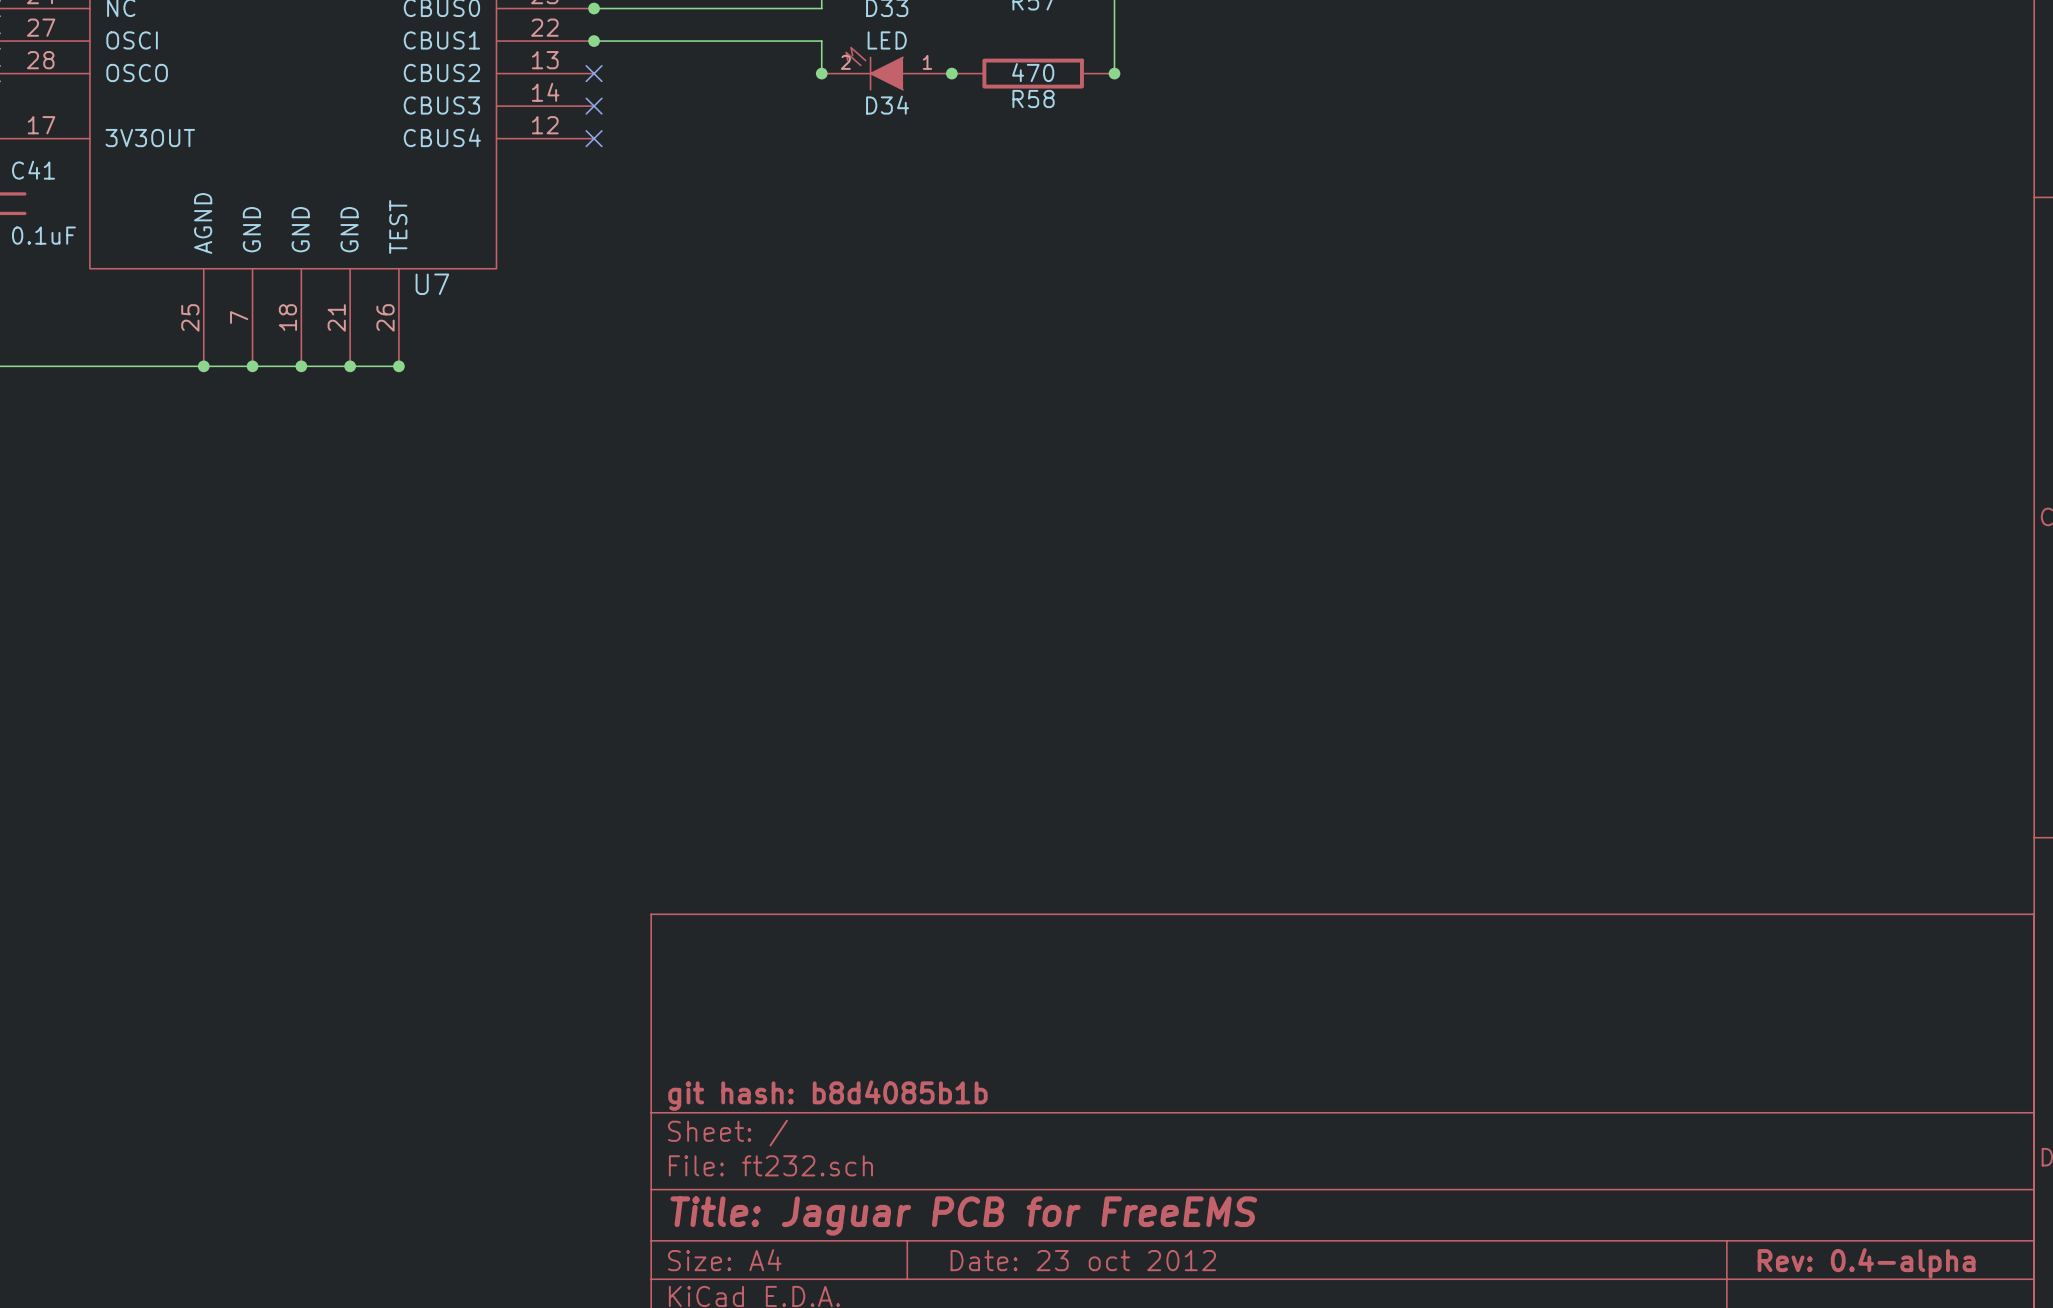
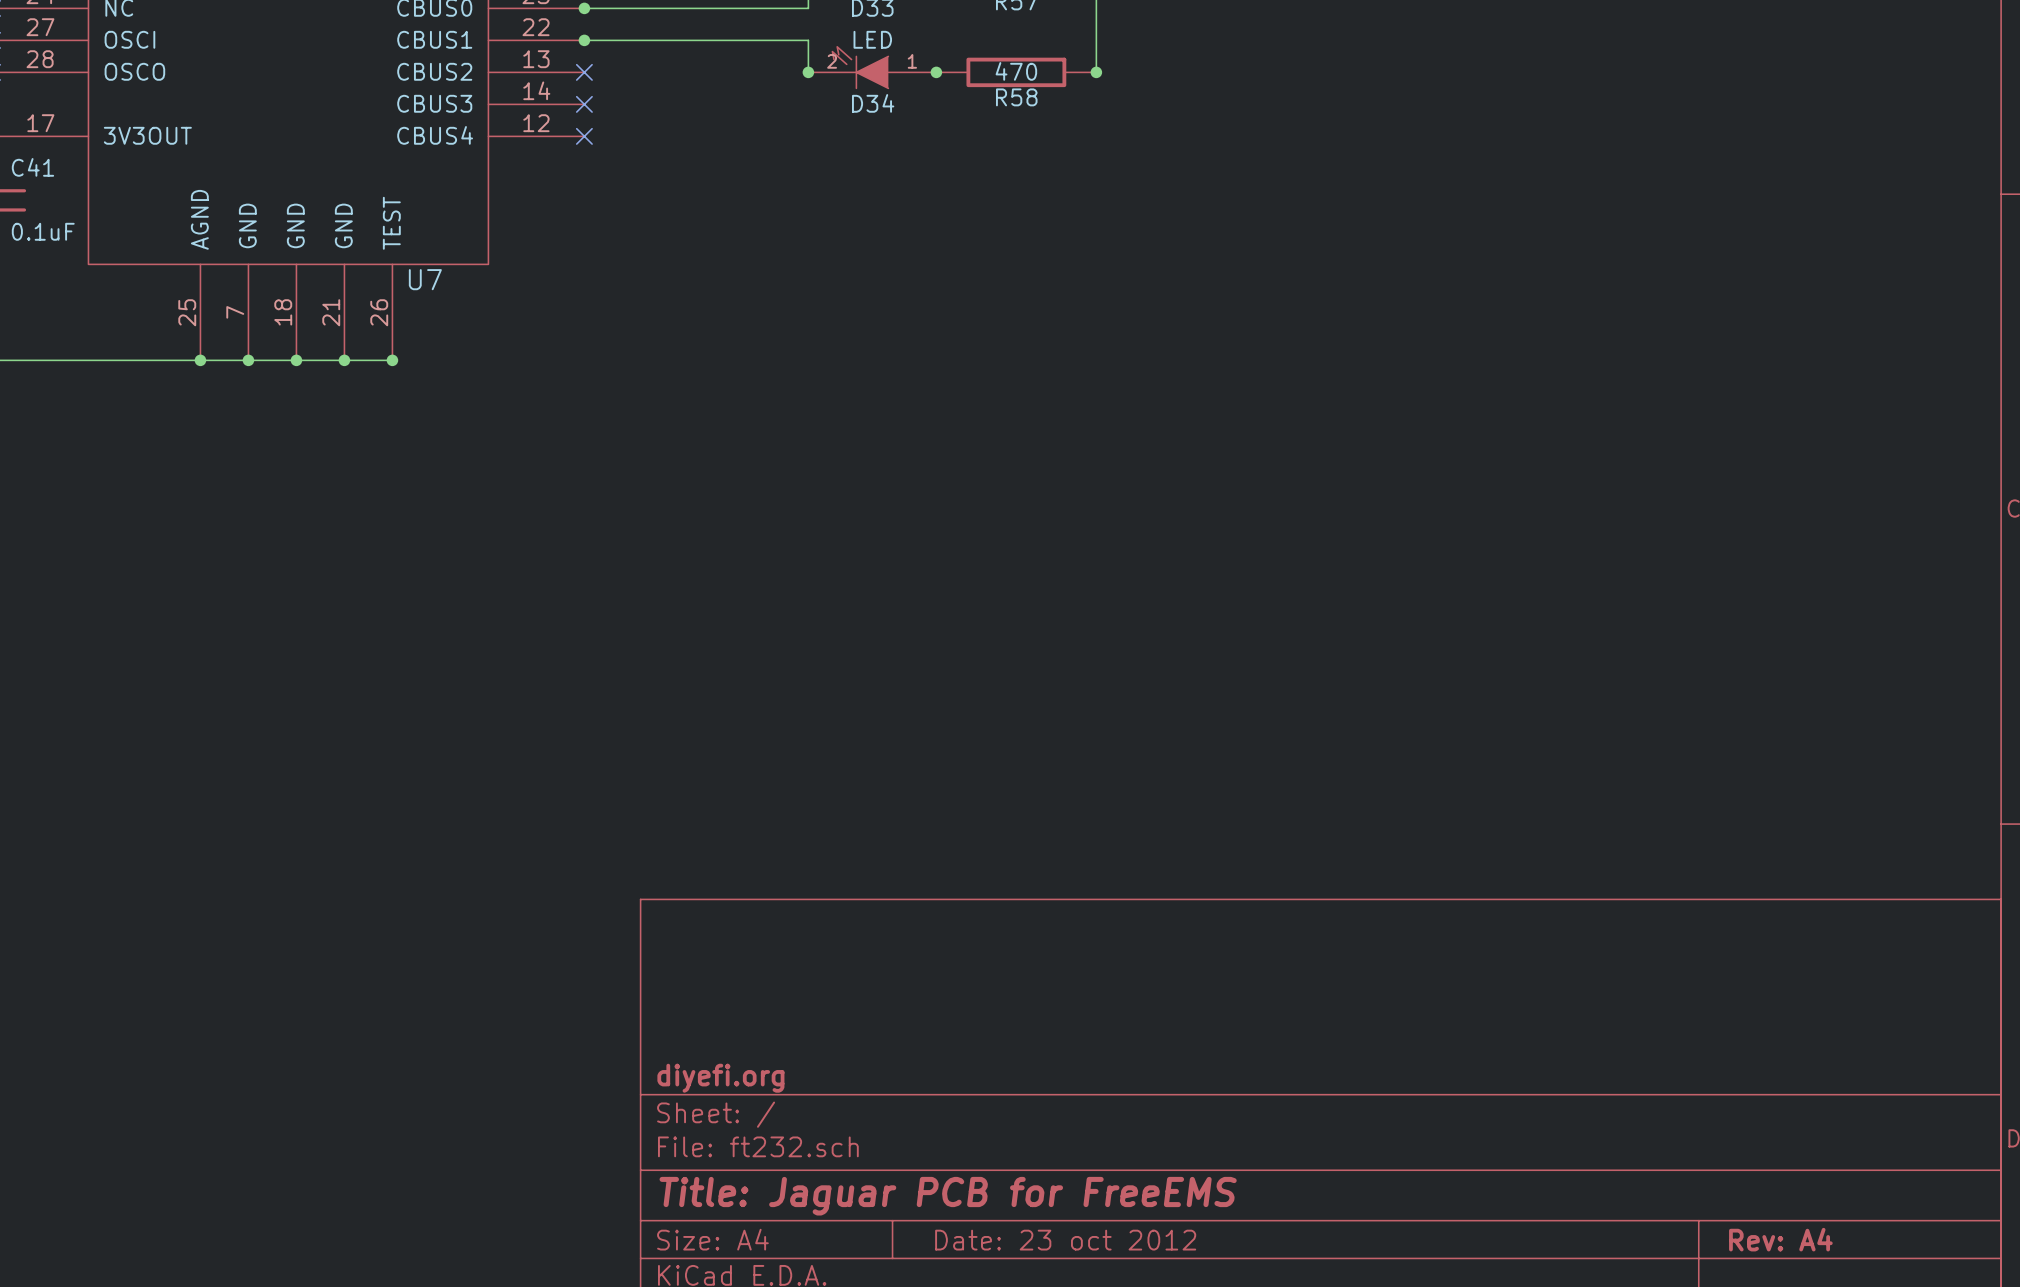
title block: git hash: b8d4085b1b (827, 1095) -> diyefi.org (720, 1078)
title block: Rev: 0.4-alpha (1866, 1263) -> Rev: A4 (1780, 1239)

